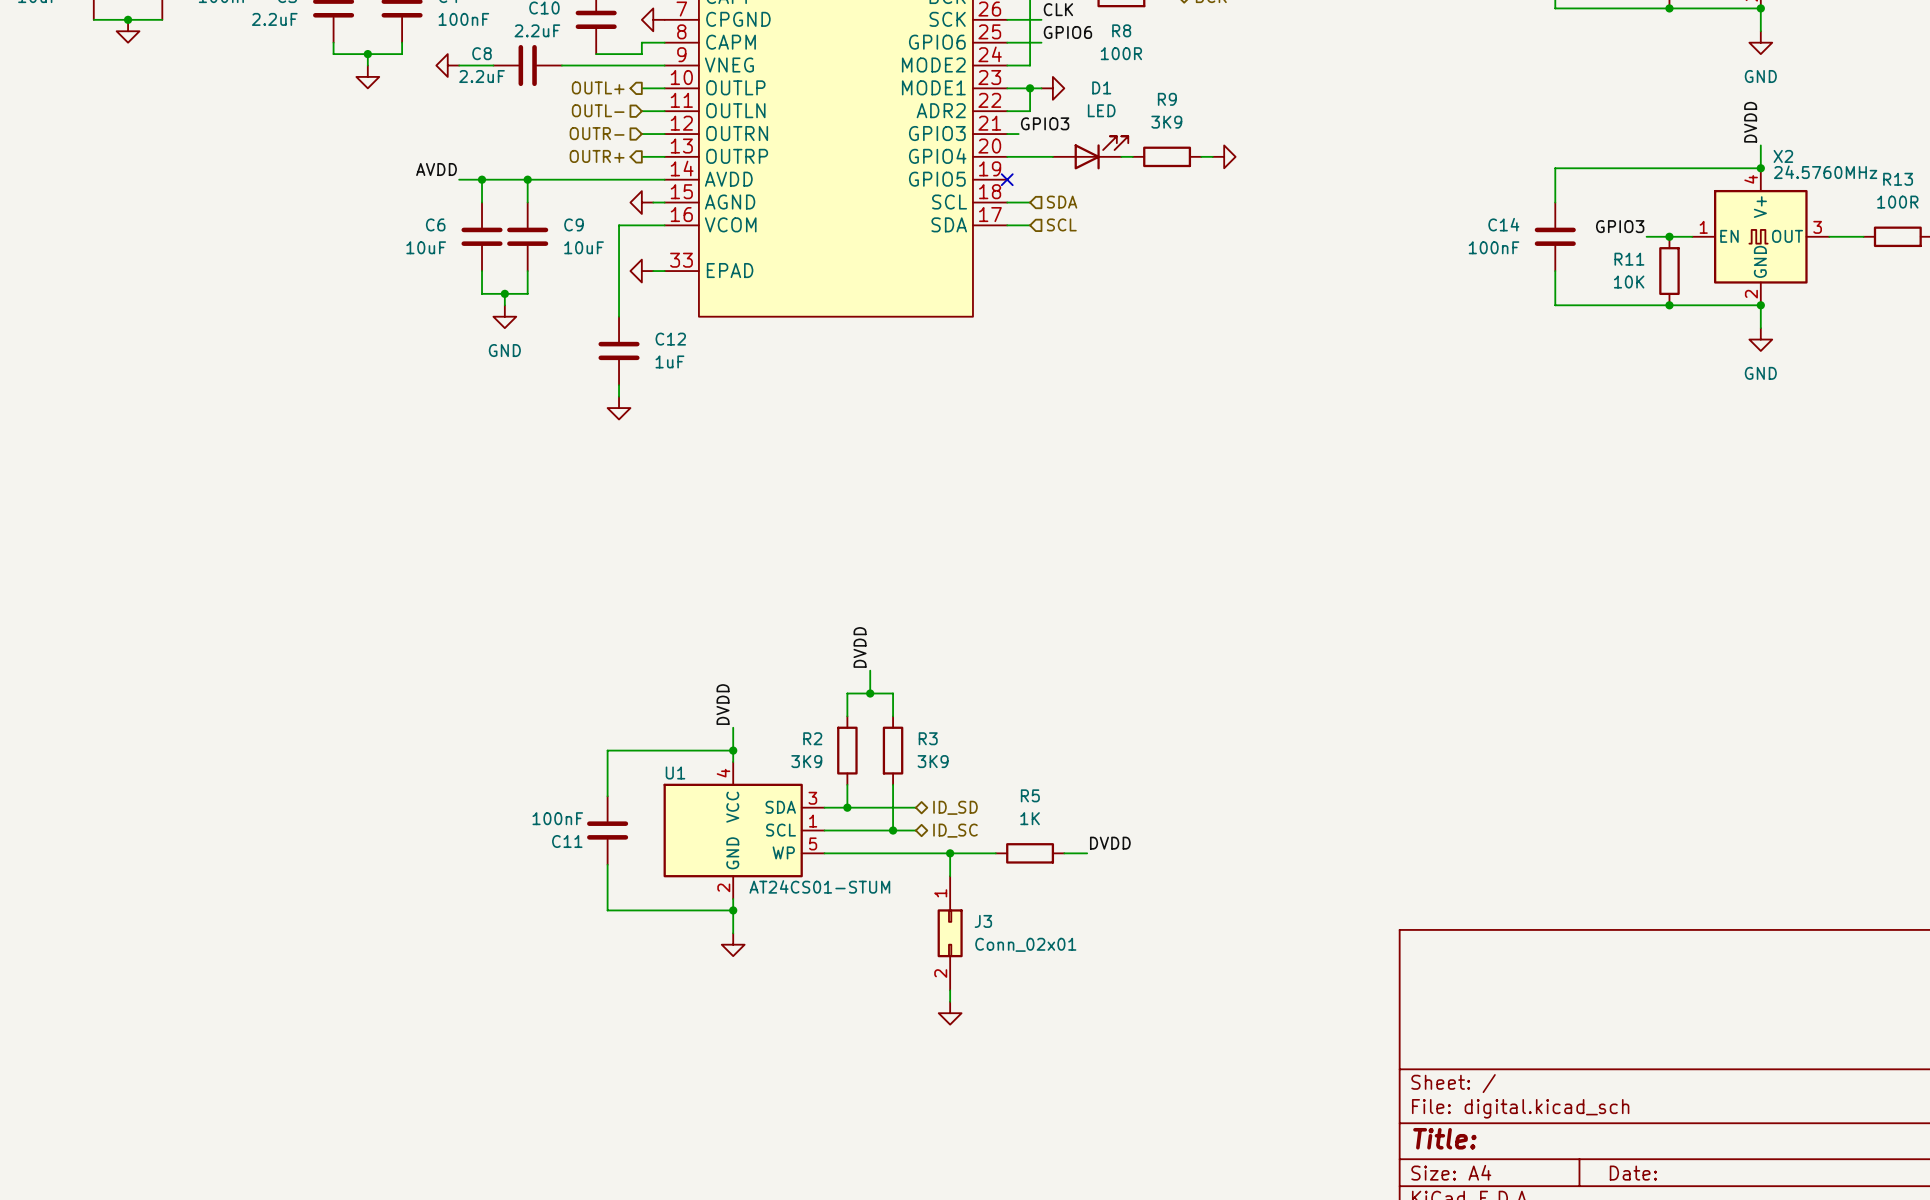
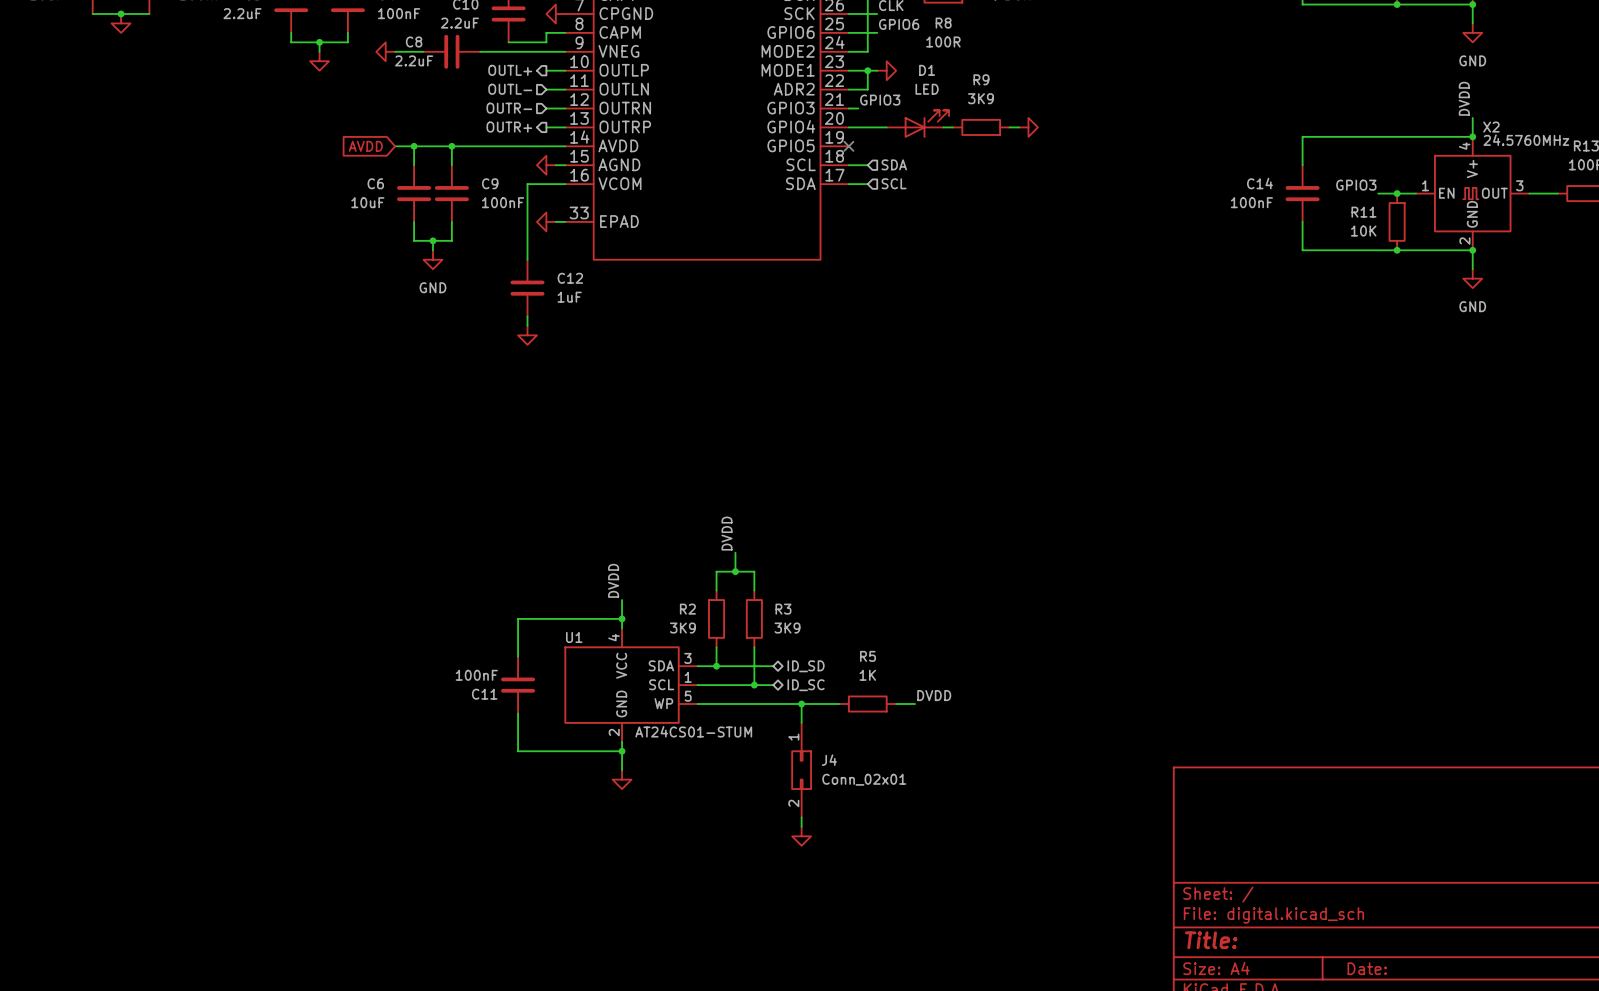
label: AVDD (436, 169) -> none
global label: none -> AVDD (365, 146)
C9 value: 10uF (584, 247) -> 100nF (503, 202)
J3 name: J3 (983, 921) -> J4 (829, 760)

